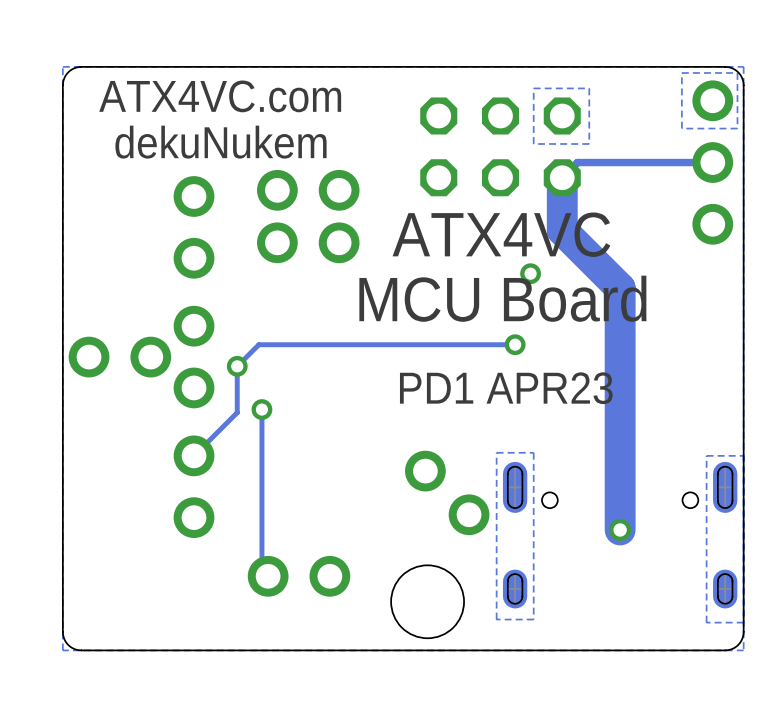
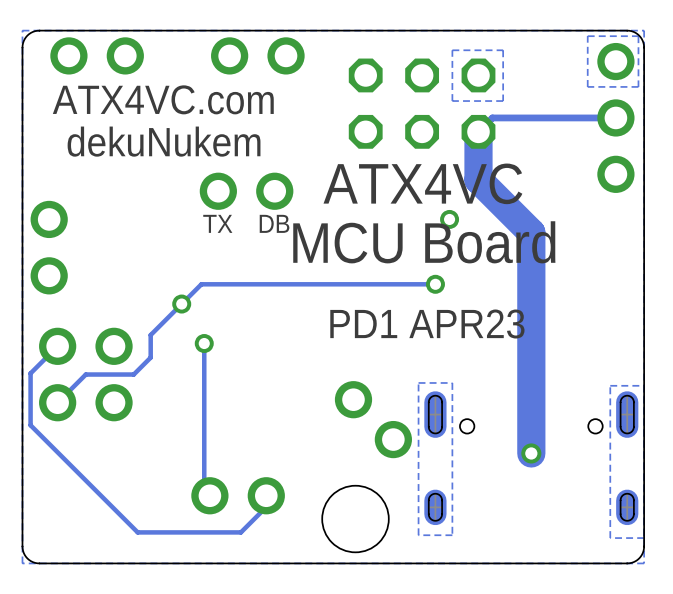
part: none -> (97, 55)
part: none -> (257, 55)
text position: ATX4VC.com (220, 96) -> ATX4VC.com (163, 99)
text position: dekuNukem (220, 142) -> dekuNukem (164, 141)
part: (308, 190) -> none
part: (194, 227) -> none
text: none -> TX (217, 223)
text: none -> DB (274, 223)
part: none -> (49, 247)
part: (119, 357) -> none
part: (194, 357) -> none
track: (237, 366) (237, 412) (194, 455) -> (181, 304) (150, 335) (150, 357) (133, 374) (85, 374) (57, 402)
track: none -> (57, 346) (30, 373) (30, 425) (137, 532) (240, 532) (266, 507) (266, 495)
part: none -> (85, 346)
part: none -> (85, 402)
part: (194, 486) -> none

